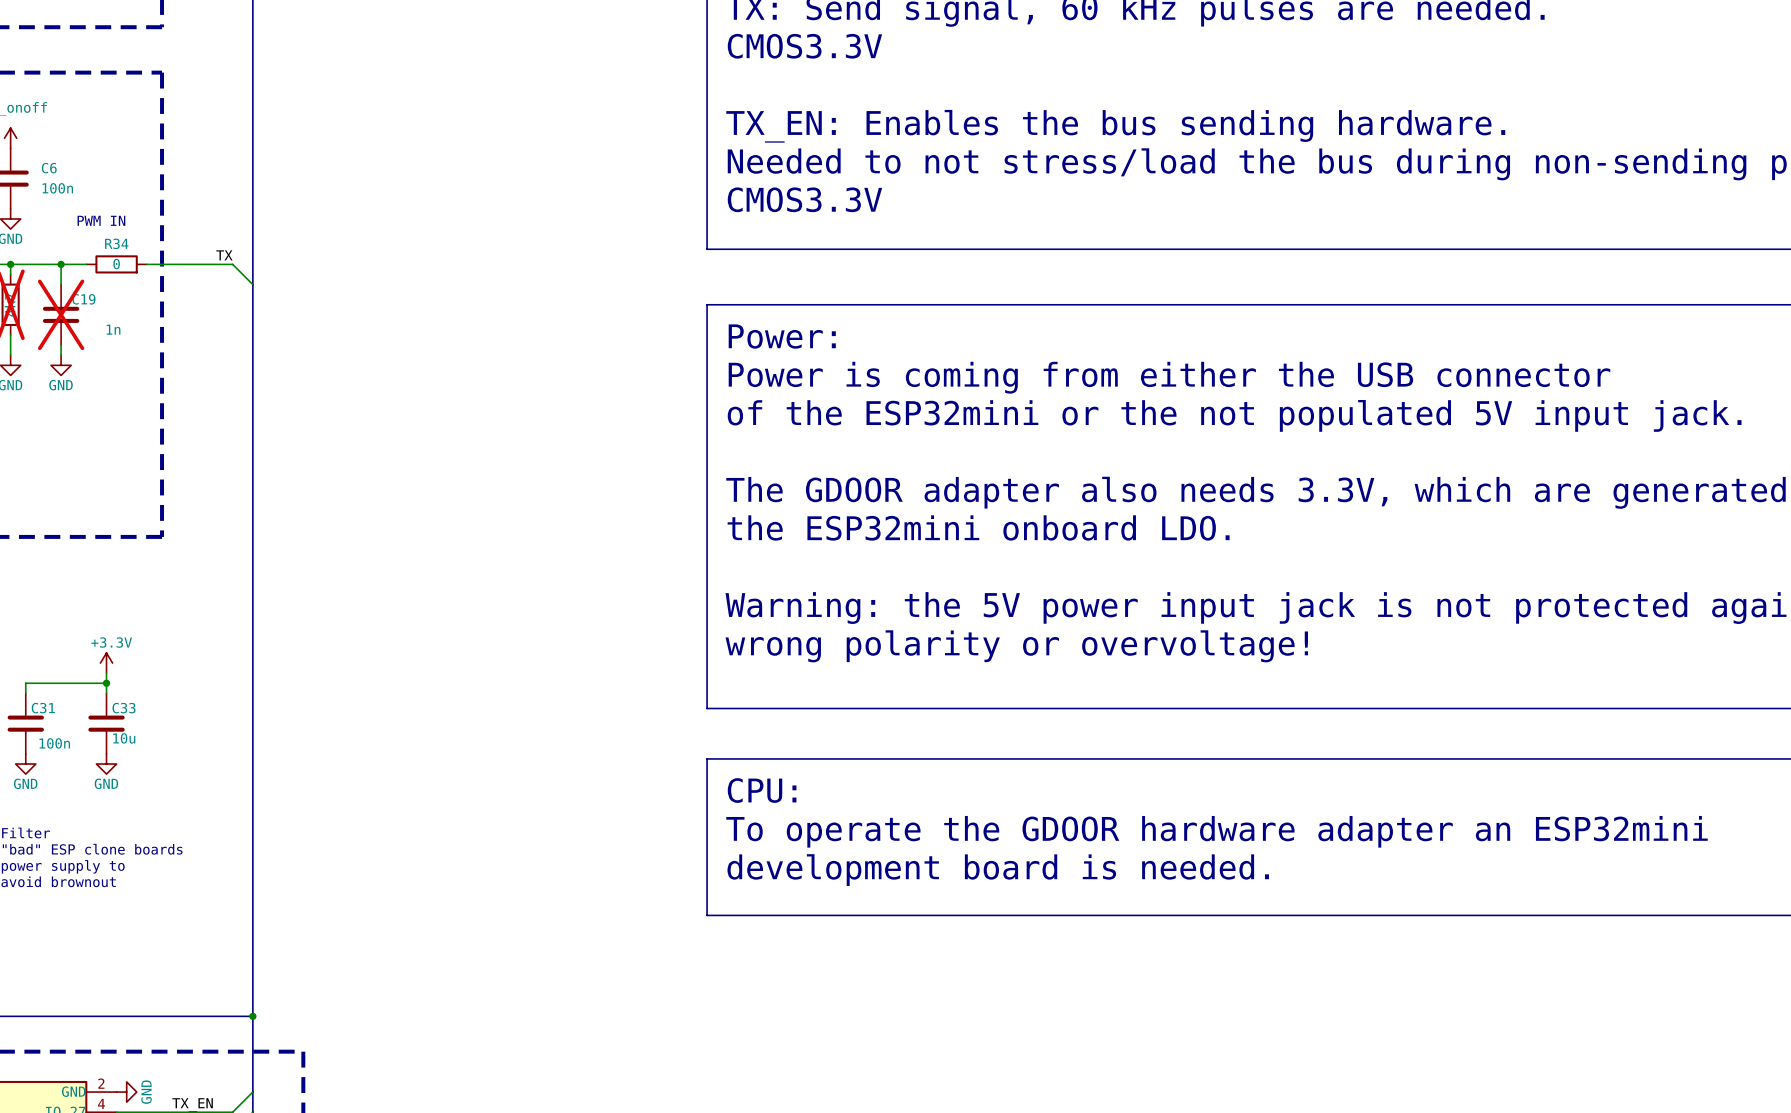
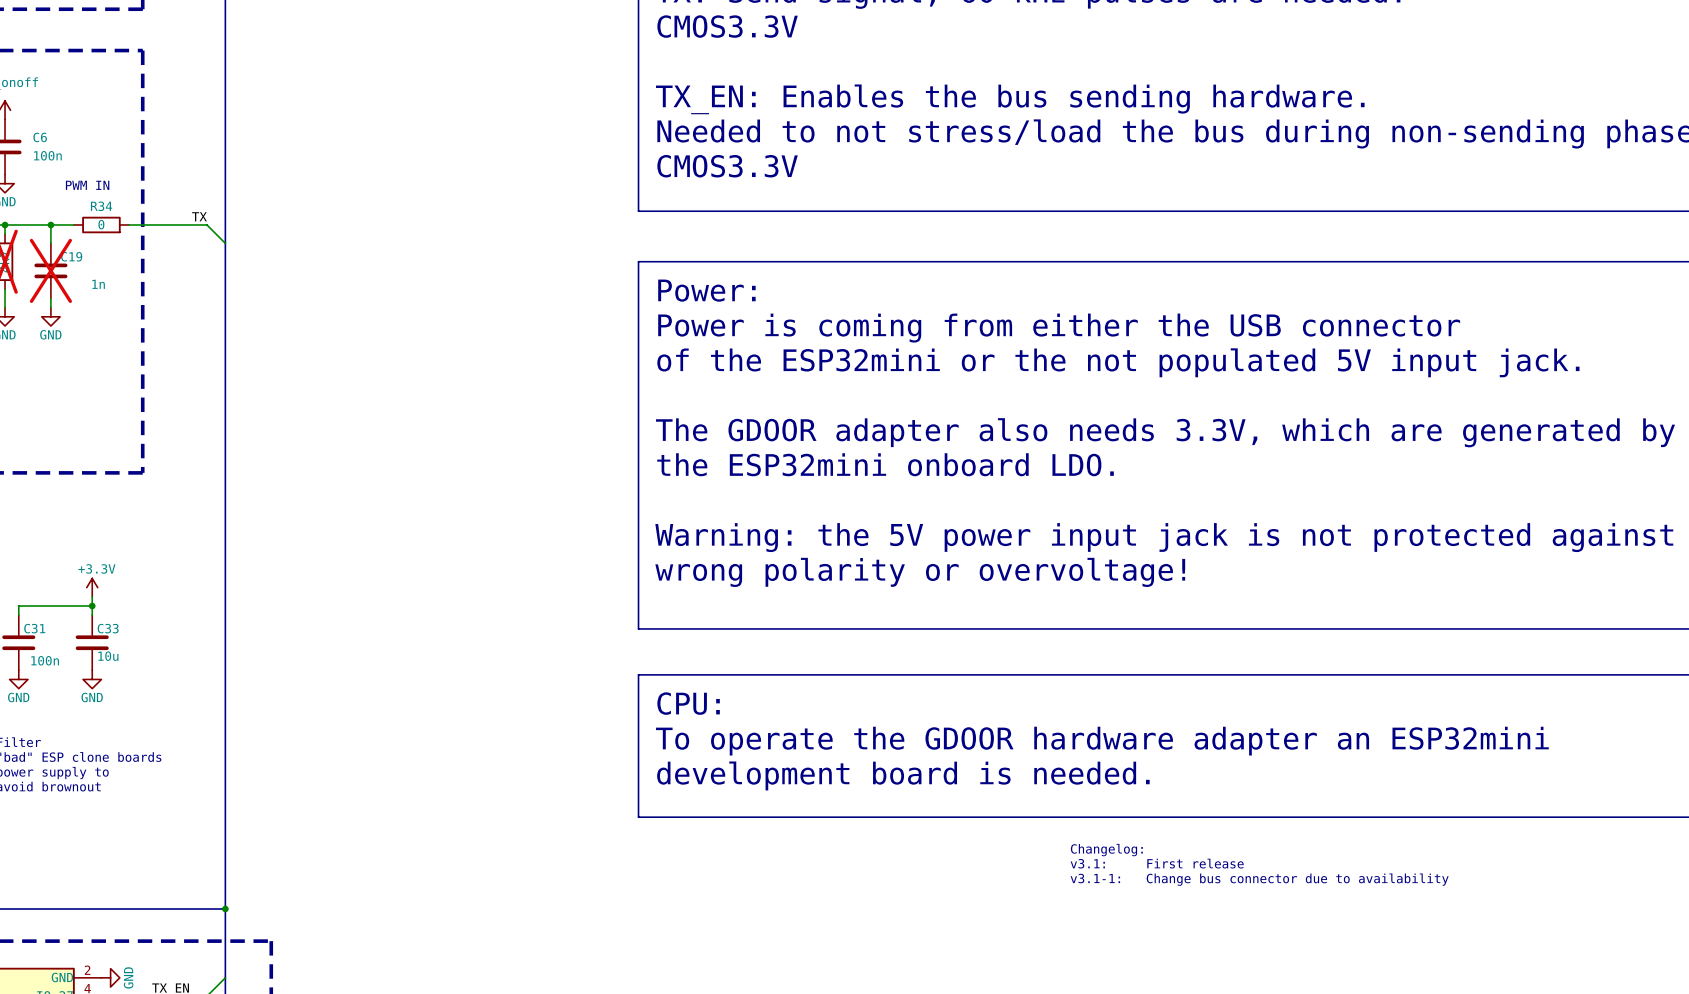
text: none -> Changelog: (1106, 850)
text: none -> v3.1: First release (1157, 863)
text: none -> v3.1-1: Change bus connector due to availability (1259, 879)

